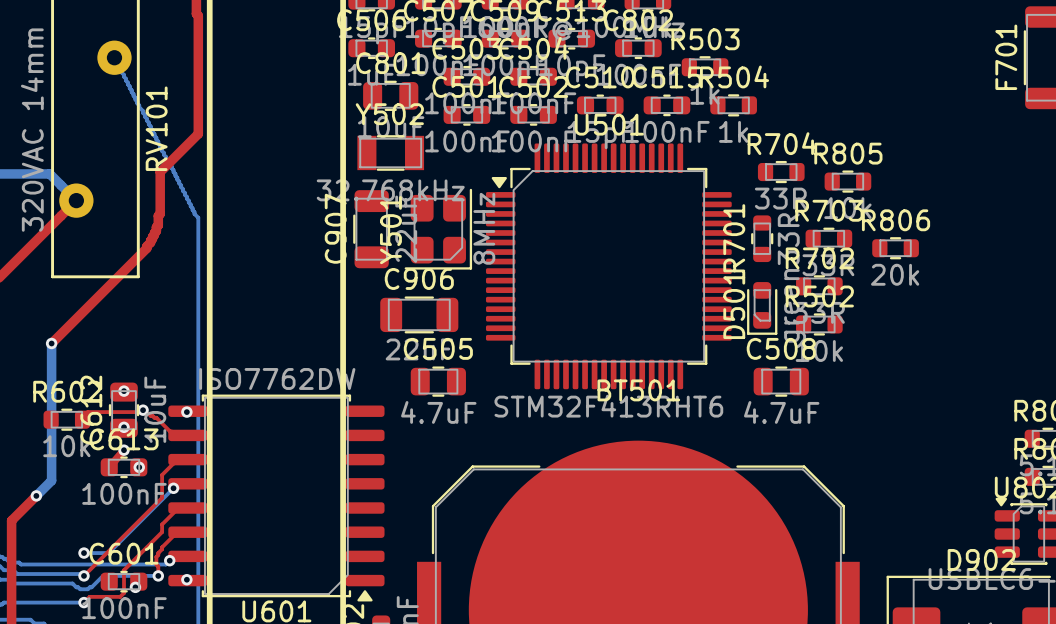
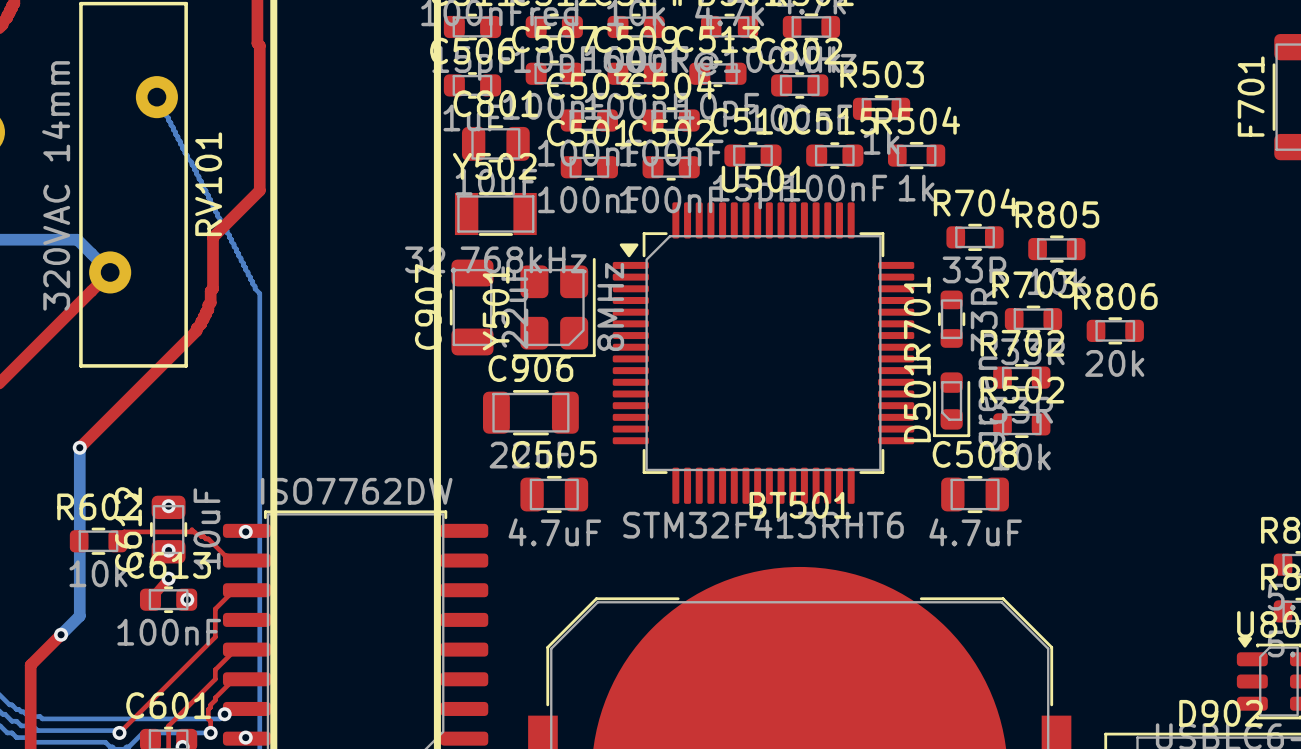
via: (143, 410) -> none
bottom track: (173, 488) (108, 553) (84, 553) -> none
via: (173, 488) -> none
via: (84, 553) -> none

